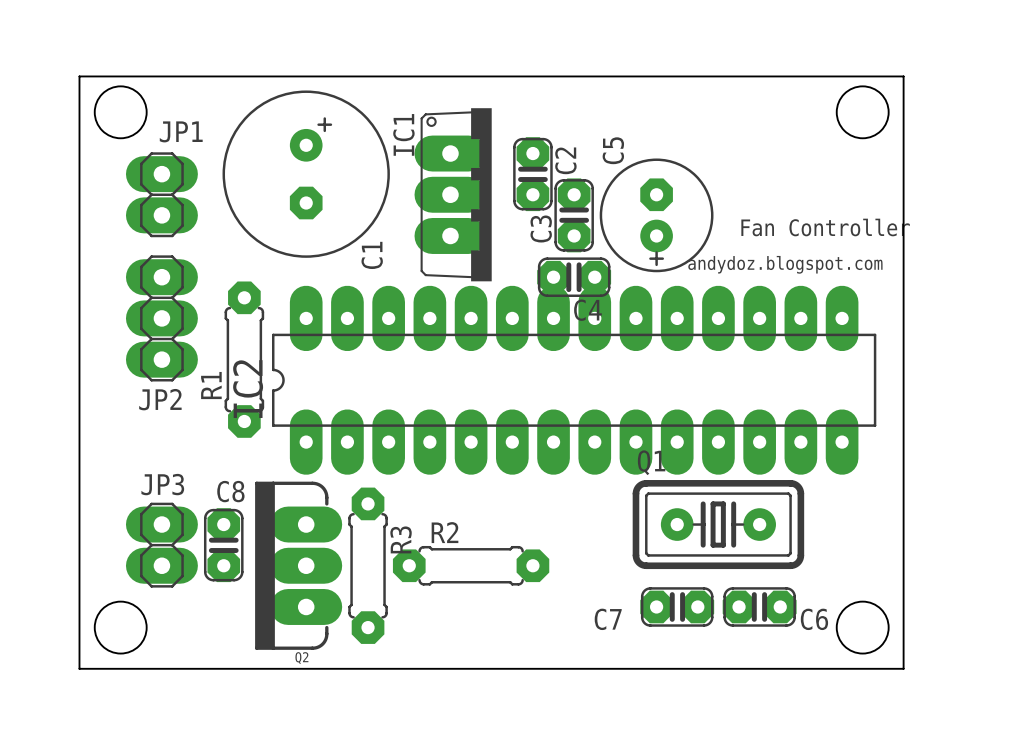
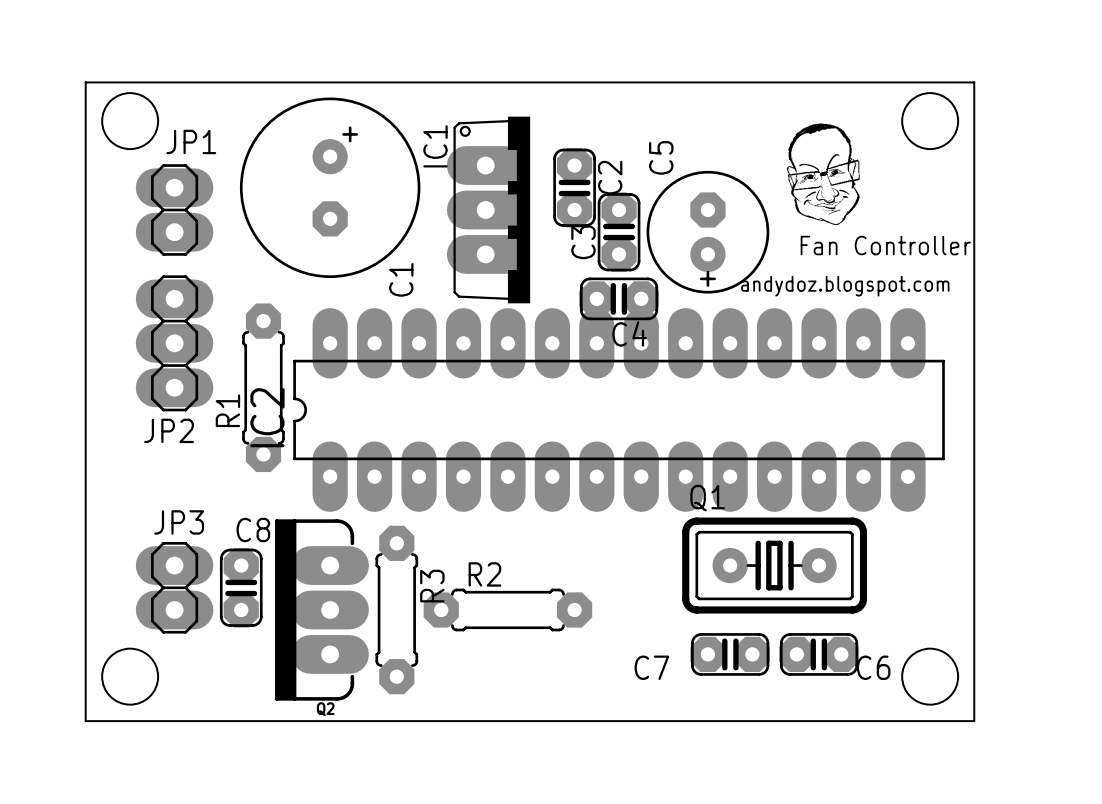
drawing: none -> [786, 123, 860, 225]

